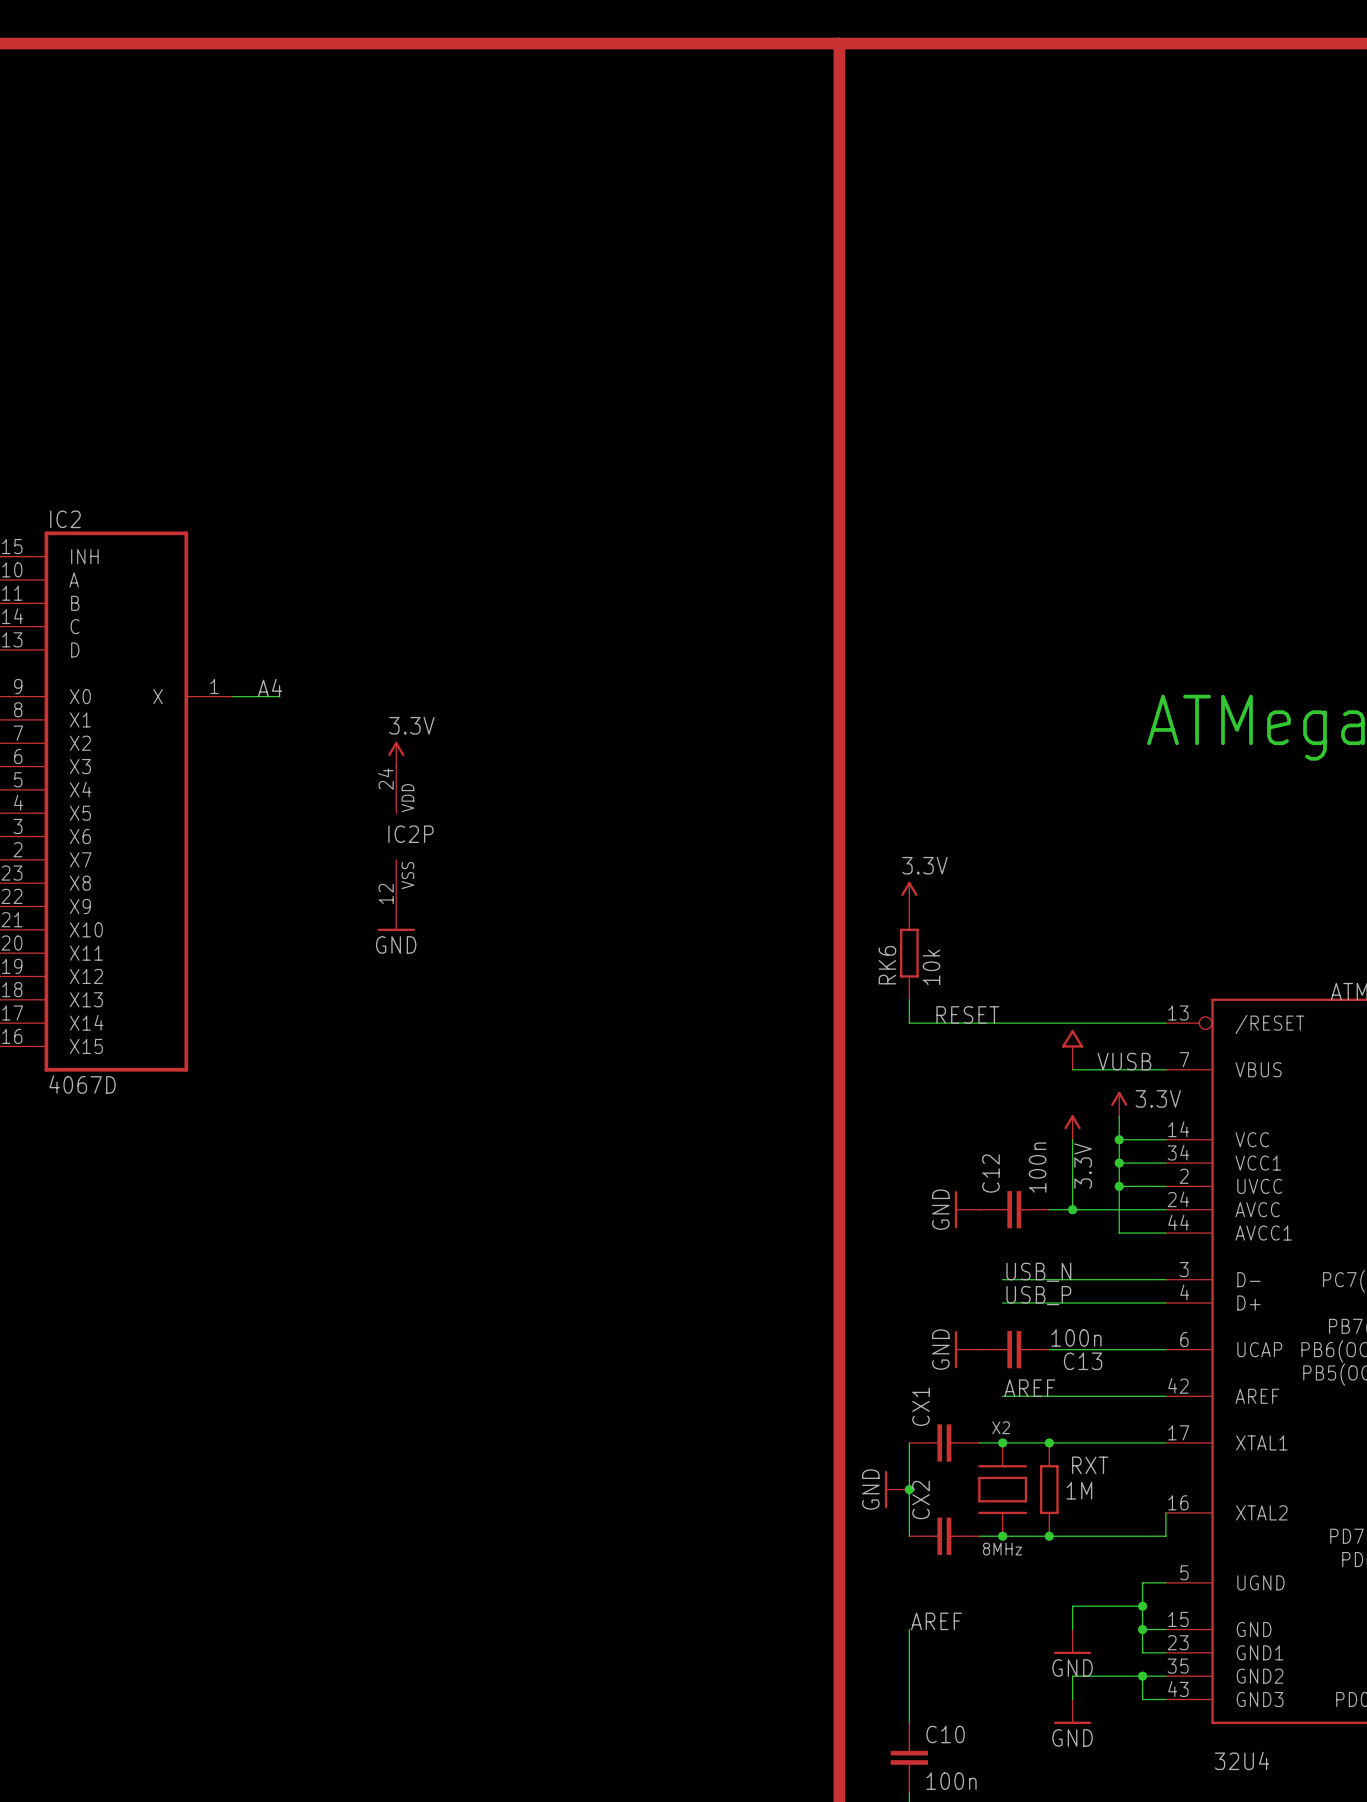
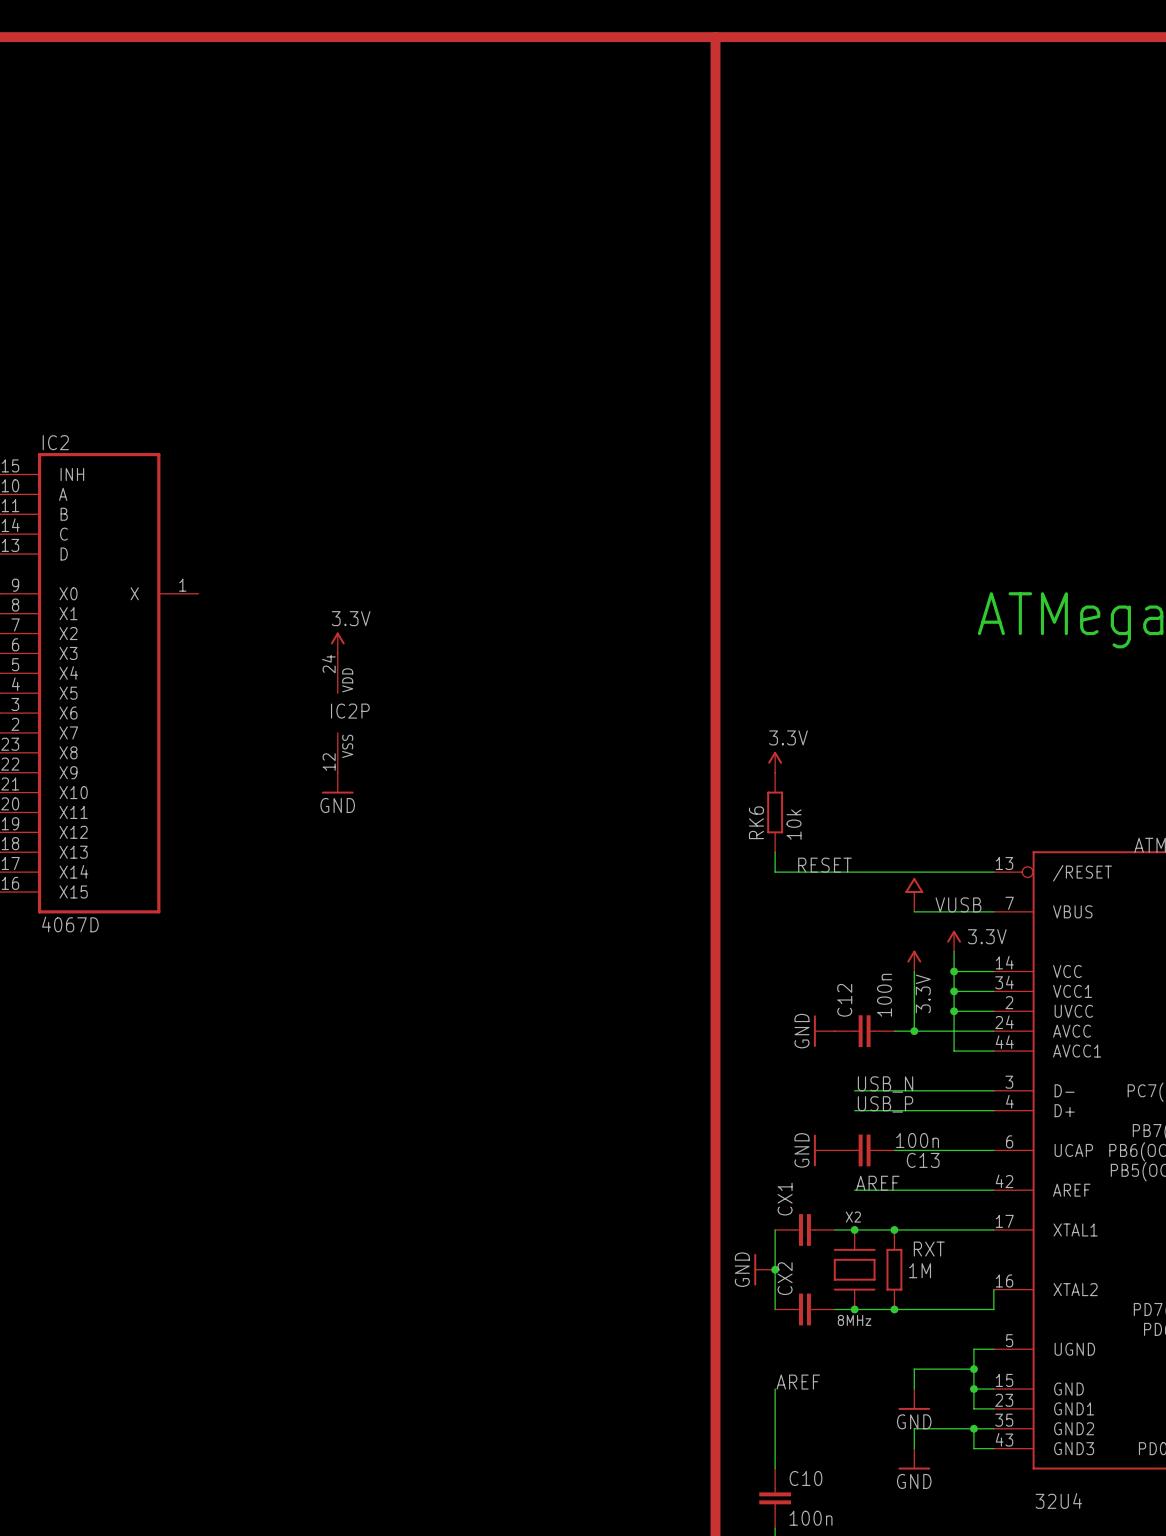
label: A4 (270, 688) -> none
wire: (232, 696) (279, 696) -> none

